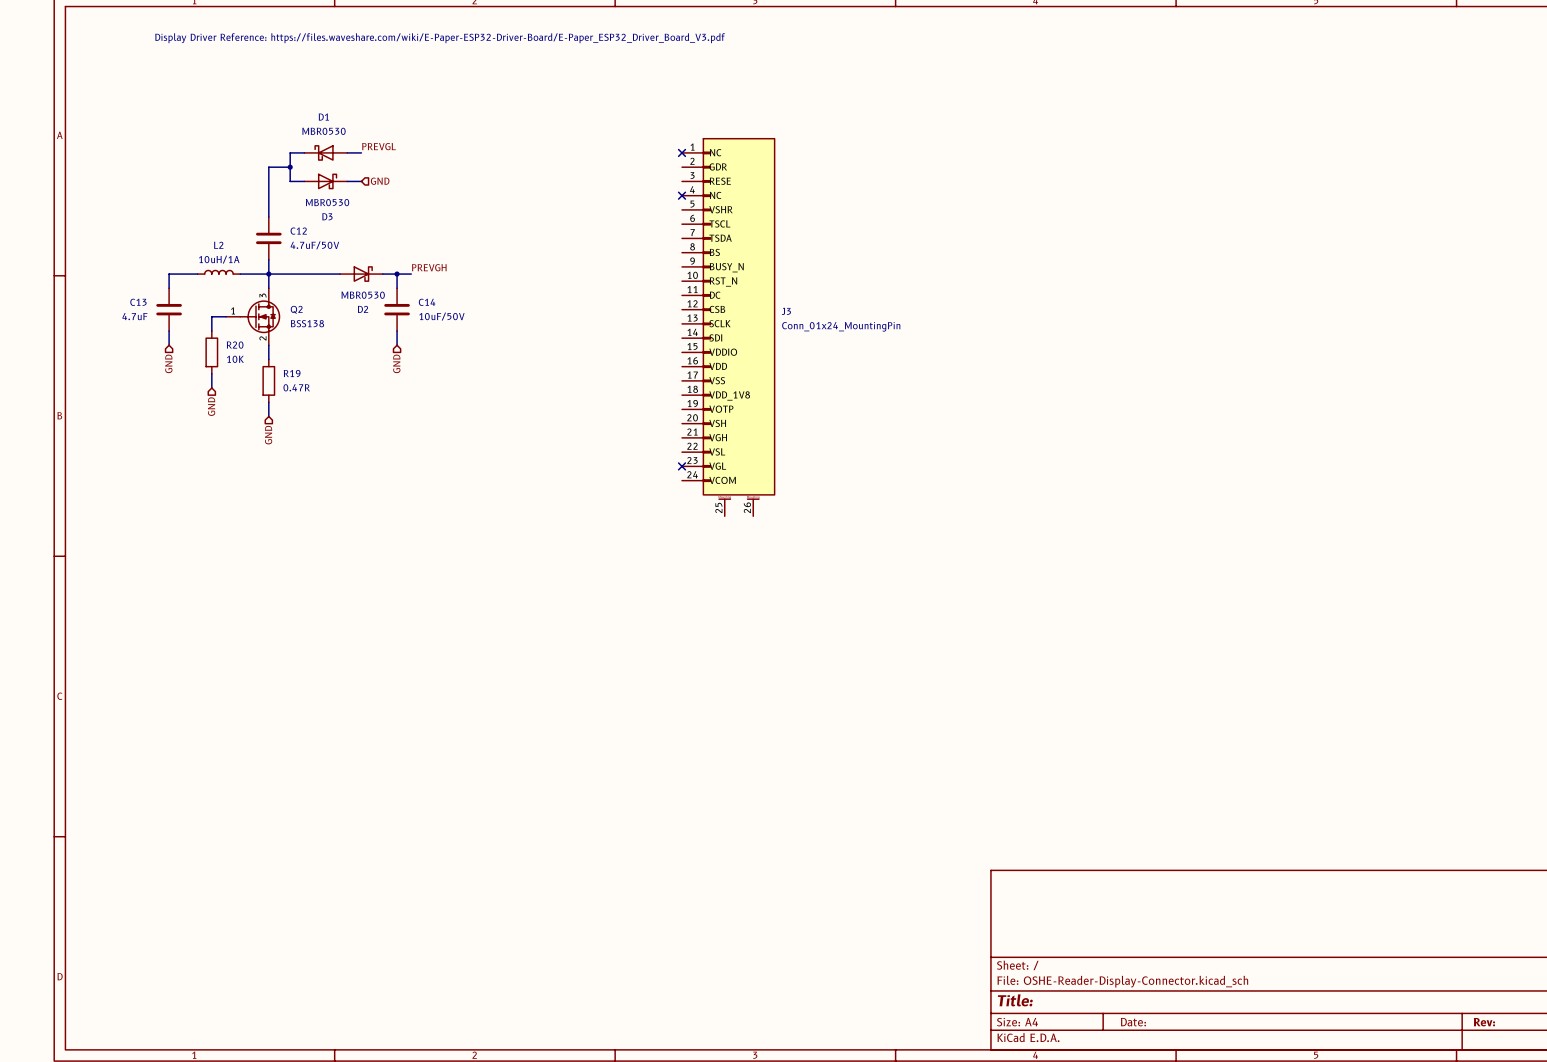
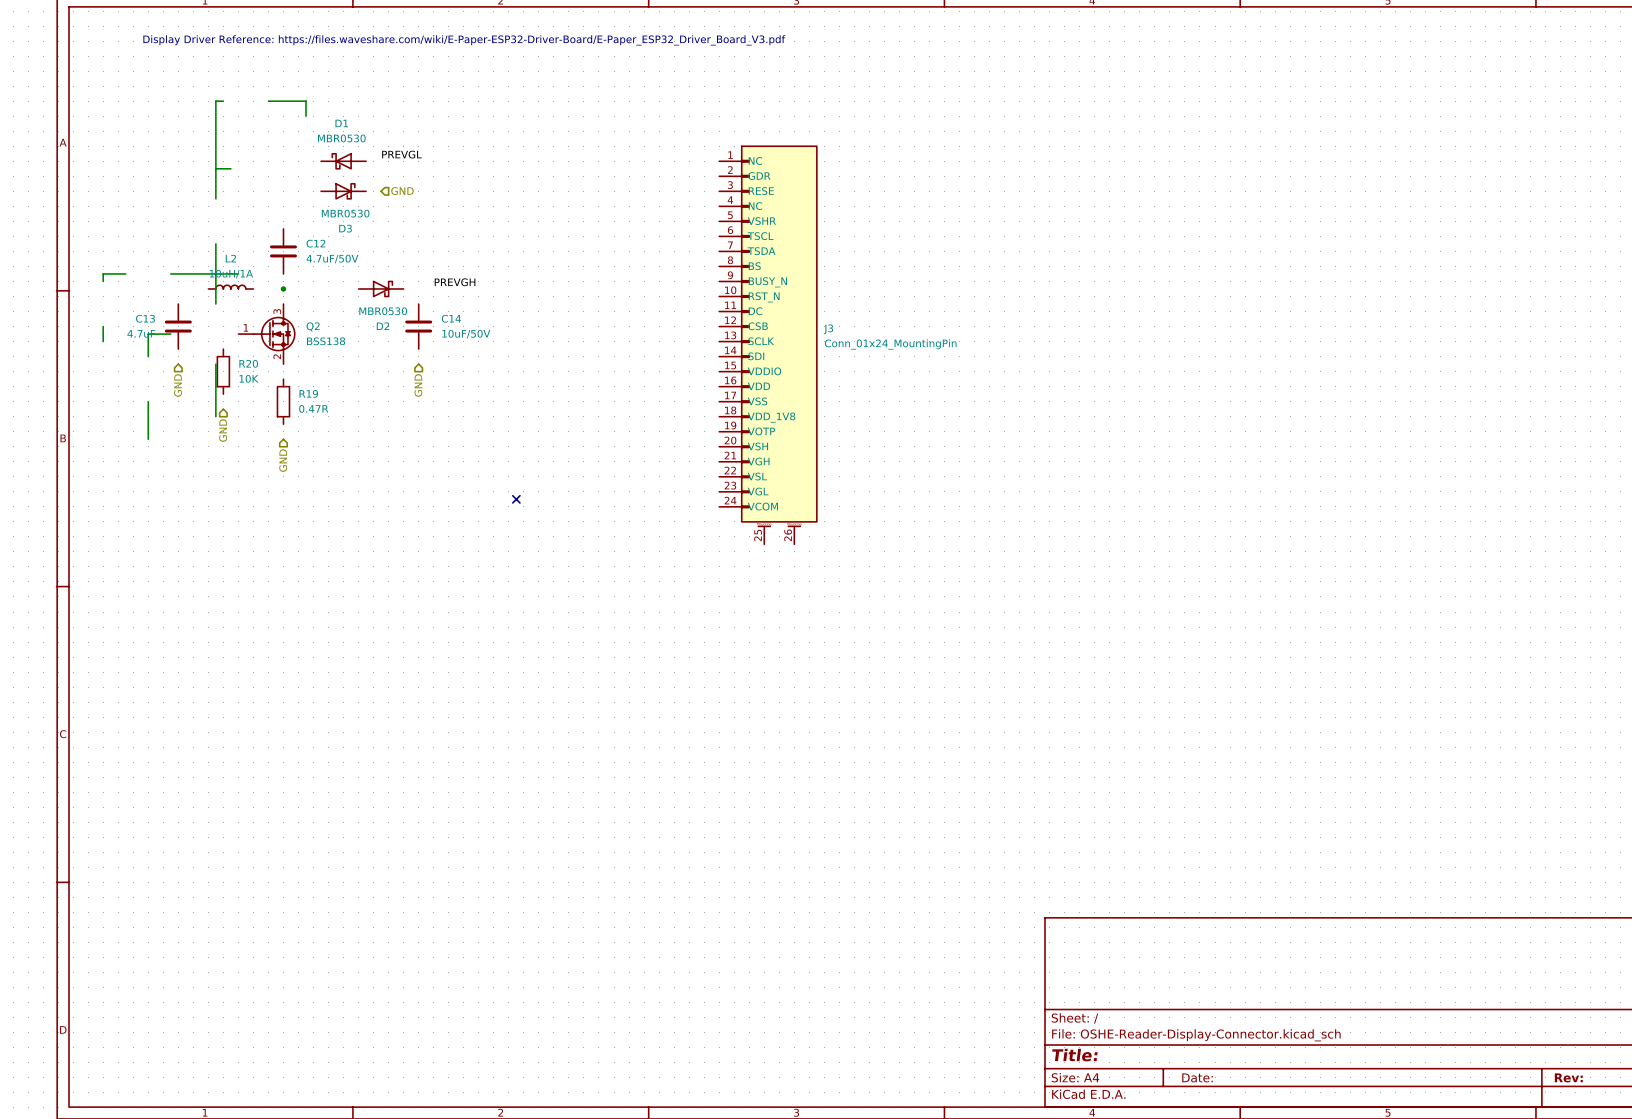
wire: none -> (223, 101) (215, 101) (215, 198)
wire: none -> (268, 101) (306, 101) (306, 116)
wire: (304, 152) (290, 152) (290, 181) (304, 181) -> none
wire: (347, 152) (361, 152) -> none
no-connect mark: (682, 152) -> none
wire: none -> (215, 168) (230, 168)
wire: (290, 167) (268, 167) (268, 217) -> none
junction: (290, 167) -> none
wire: (347, 181) (361, 181) -> none
no-connect mark: (682, 195) -> none
wire: none -> (215, 243) (215, 304)
wire: none -> (125, 273) (103, 273) (103, 281)
wire: none -> (170, 273) (238, 273)
wire: (268, 259) (268, 288) -> none
wire: (197, 274) (169, 274) (169, 288) -> none
wire: (240, 274) (340, 274) -> none
wire: (382, 274) (411, 274) -> none
wire: (397, 274) (397, 288) -> none
junction: (397, 274) -> none
wire: none -> (170, 334) (148, 334) (148, 356)
wire: (226, 316) (211, 316) (211, 331) -> none
wire: (169, 331) (169, 345) -> (103, 326) (103, 341)
wire: (397, 331) (397, 345) -> none
wire: none -> (215, 364) (215, 416)
wire: (268, 345) (268, 359) -> none
wire: (211, 373) (211, 388) -> none
wire: none -> (148, 401) (148, 439)
wire: (268, 402) (268, 416) -> none
no-connect mark: (682, 466) -> none
no-connect mark: none -> (516, 499)

